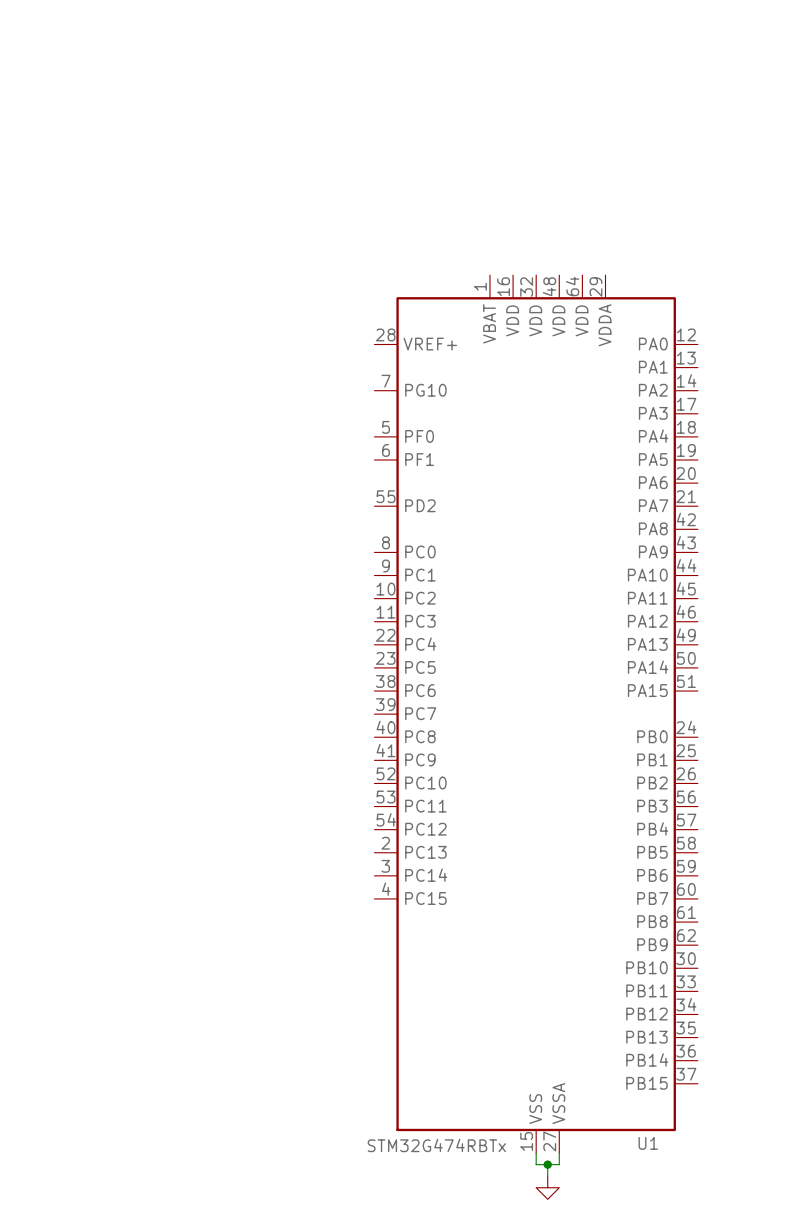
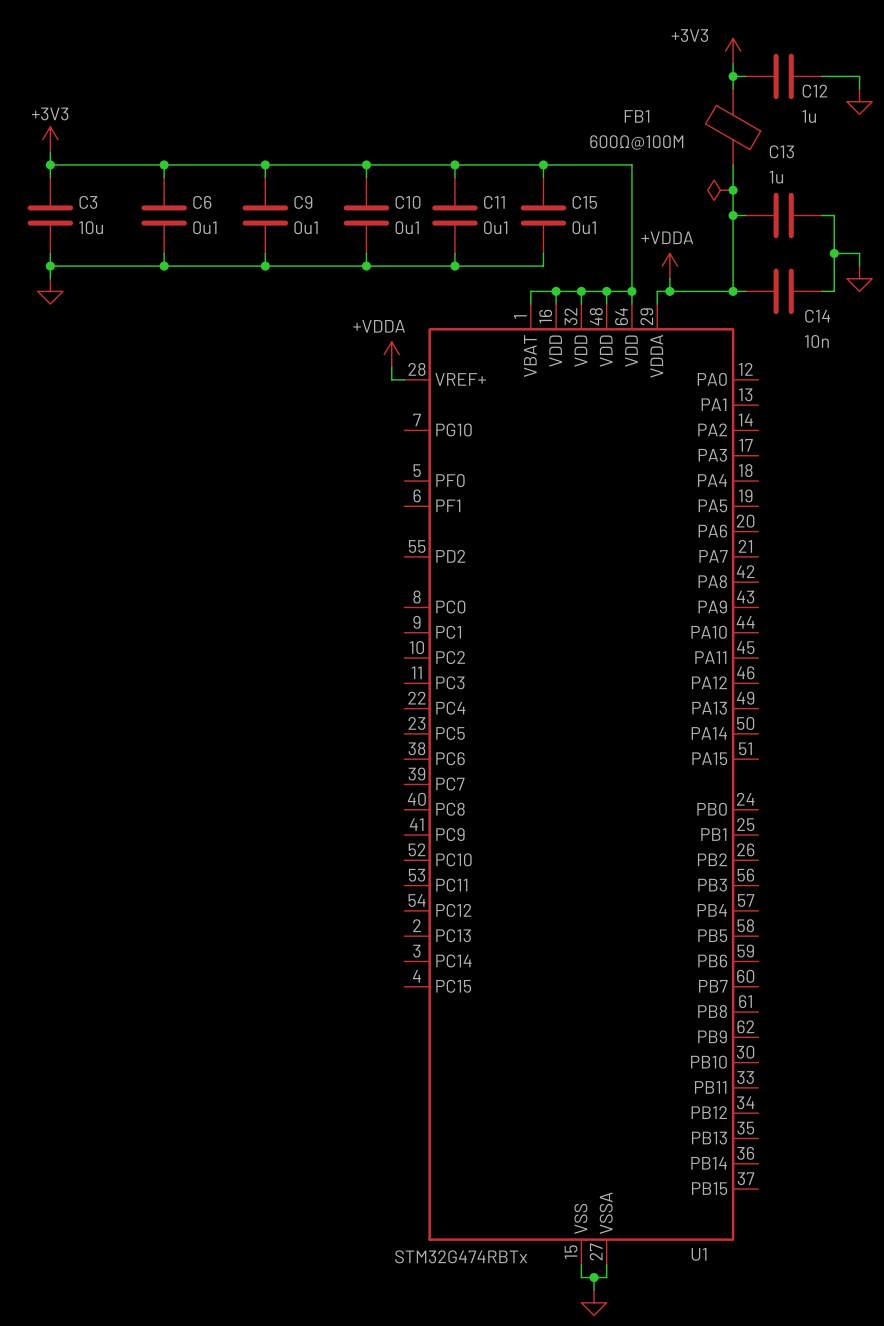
power symbol: none -> +3V3 (733, 51)
wire: none -> (733, 63) (733, 89)
wire: none -> (733, 76) (745, 76)
junction: none -> (733, 76)
C12: none -> 1u (783, 76)
wire: none -> (821, 76) (859, 76) (859, 89)
power symbol: none -> (859, 101)
FB1: none -> 600Ω@100M (733, 127)
power symbol: none -> +3V3 (50, 139)
wire: none -> (50, 152) (50, 177)
wire: none -> (50, 164) (631, 164) (631, 304)
junction: none -> (50, 164)
wire: none -> (164, 164) (164, 177)
junction: none -> (164, 164)
wire: none -> (265, 164) (265, 177)
junction: none -> (265, 164)
wire: none -> (366, 164) (366, 177)
junction: none -> (366, 164)
wire: none -> (454, 164) (454, 177)
junction: none -> (454, 164)
wire: none -> (543, 164) (543, 177)
junction: none -> (543, 164)
wire: none -> (733, 164) (733, 291)
power symbol: none -> (720, 190)
junction: none -> (733, 190)
C3: none -> 10u (50, 215)
C6: none -> 0u1 (164, 215)
C9: none -> 0u1 (265, 215)
C10: none -> 0u1 (366, 215)
C11: none -> 0u1 (454, 215)
C15: none -> 0u1 (543, 215)
wire: none -> (733, 215) (745, 215)
junction: none -> (733, 215)
C13: none -> 1u (783, 215)
wire: none -> (821, 215) (834, 215) (834, 291) (821, 291)
wire: none -> (50, 253) (50, 278)
wire: none -> (164, 253) (164, 266)
wire: none -> (265, 253) (265, 266)
wire: none -> (366, 253) (366, 266)
wire: none -> (454, 253) (454, 266)
wire: none -> (543, 253) (543, 266) (50, 266)
wire: none -> (834, 253) (859, 253) (859, 266)
junction: none -> (834, 253)
junction: none -> (50, 266)
junction: none -> (164, 266)
junction: none -> (265, 266)
junction: none -> (366, 266)
junction: none -> (454, 266)
power symbol: none -> +VDDA (669, 266)
wire: none -> (669, 278) (669, 291)
power symbol: none -> (859, 278)
power symbol: none -> (50, 291)
wire: none -> (556, 291) (556, 304)
junction: none -> (556, 291)
wire: none -> (581, 291) (581, 304)
junction: none -> (581, 291)
wire: none -> (606, 291) (606, 304)
junction: none -> (606, 291)
wire: none -> (631, 291) (530, 291) (530, 304)
junction: none -> (631, 291)
junction: none -> (669, 291)
junction: none -> (733, 291)
wire: none -> (745, 291) (657, 291) (657, 304)
C14: none -> 10n (783, 291)
power symbol: none -> +VDDA (391, 354)
wire: none -> (391, 367) (391, 379) (404, 379)

